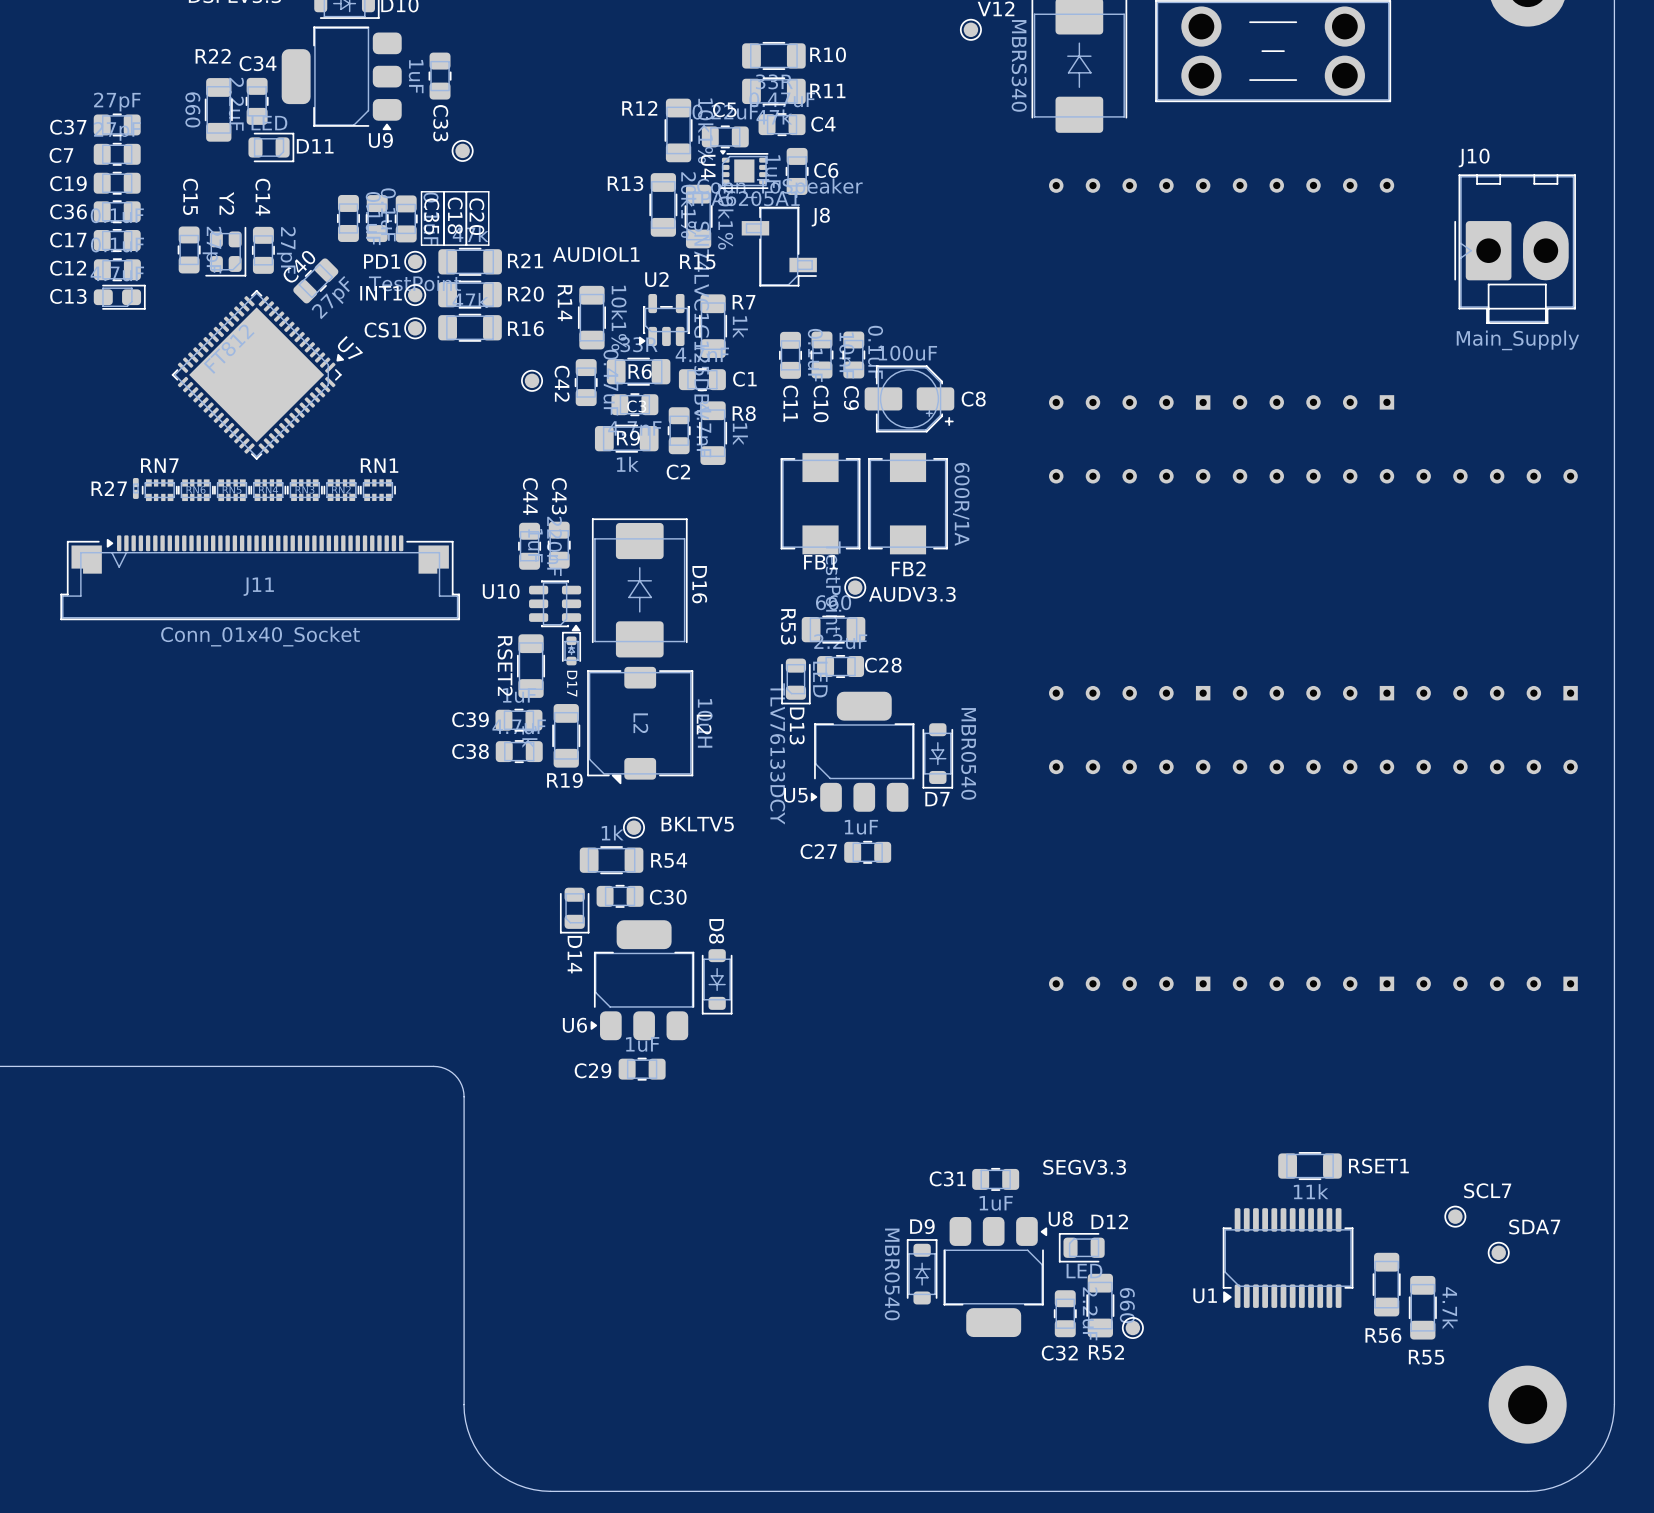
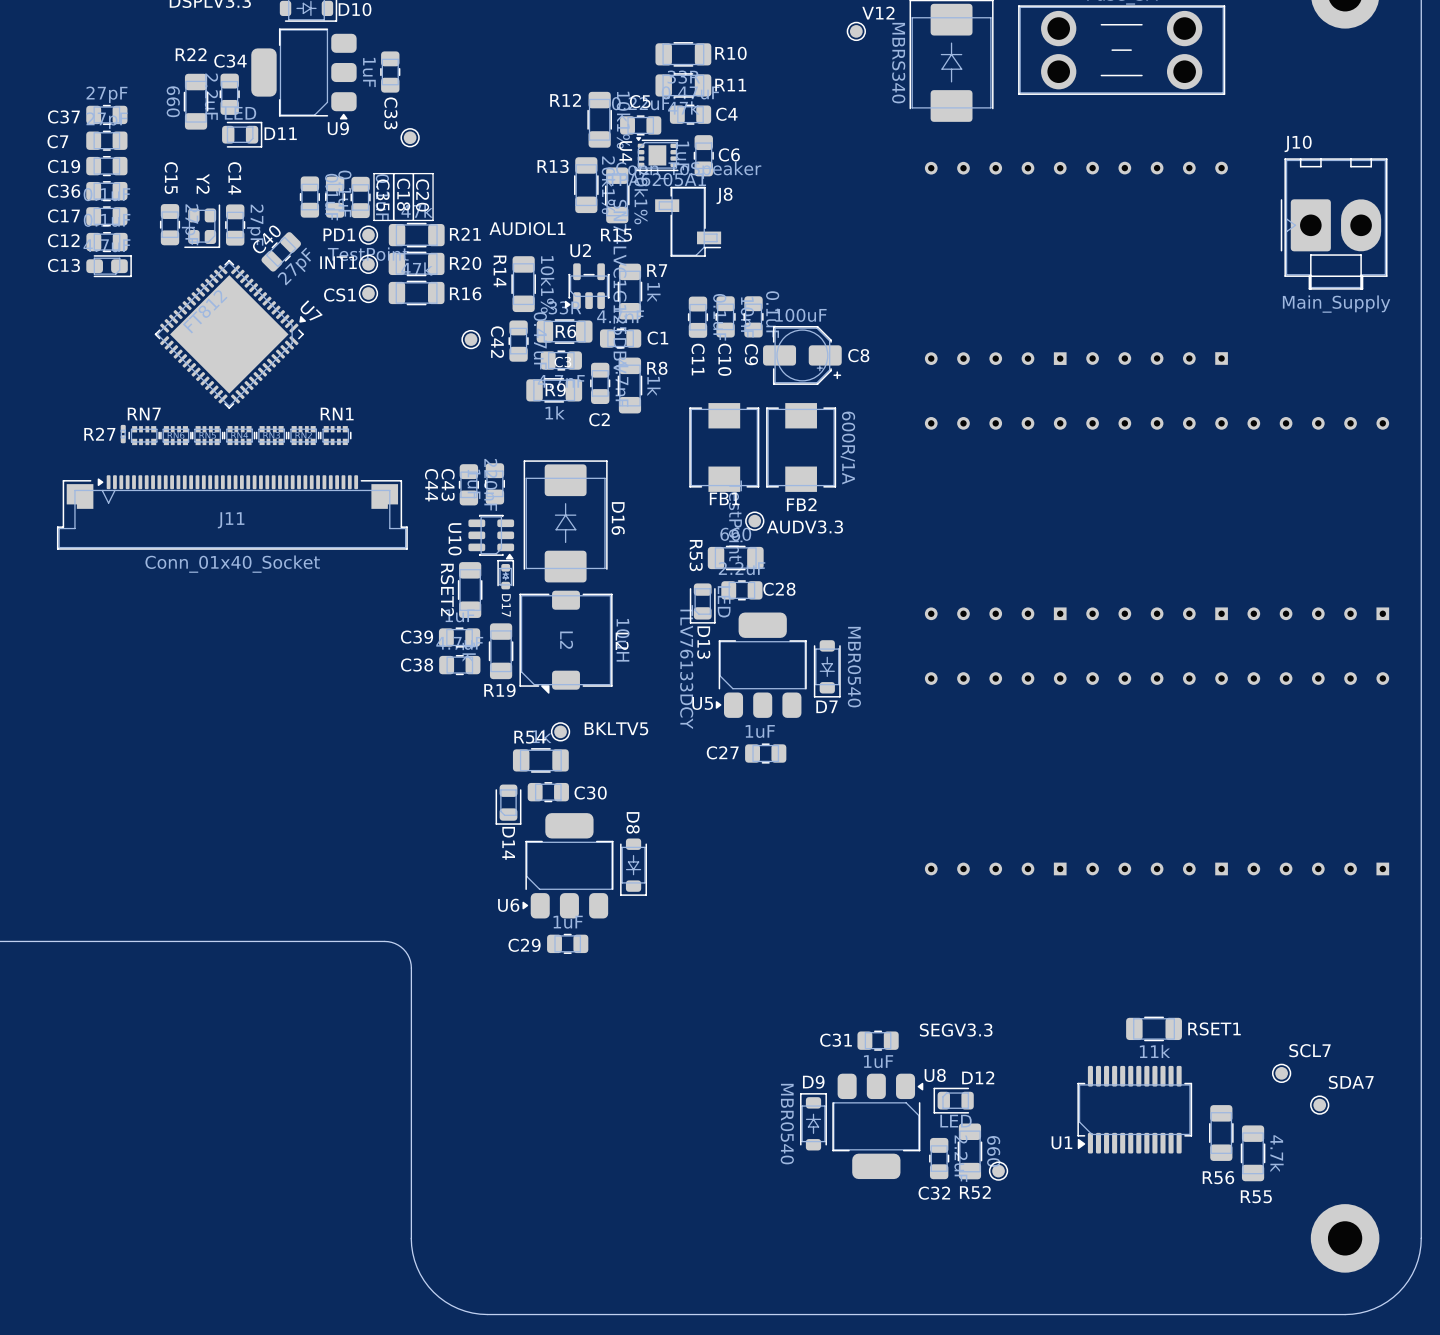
C44 name position: C44 (530, 496) -> C44 (431, 485)
C43 name position: C43 (559, 496) -> C43 (448, 484)
U10 name rotation: 0° (501, 591) -> 90° clockwise (455, 539)
R54 name position: R54 (669, 860) -> R54 (530, 737)

